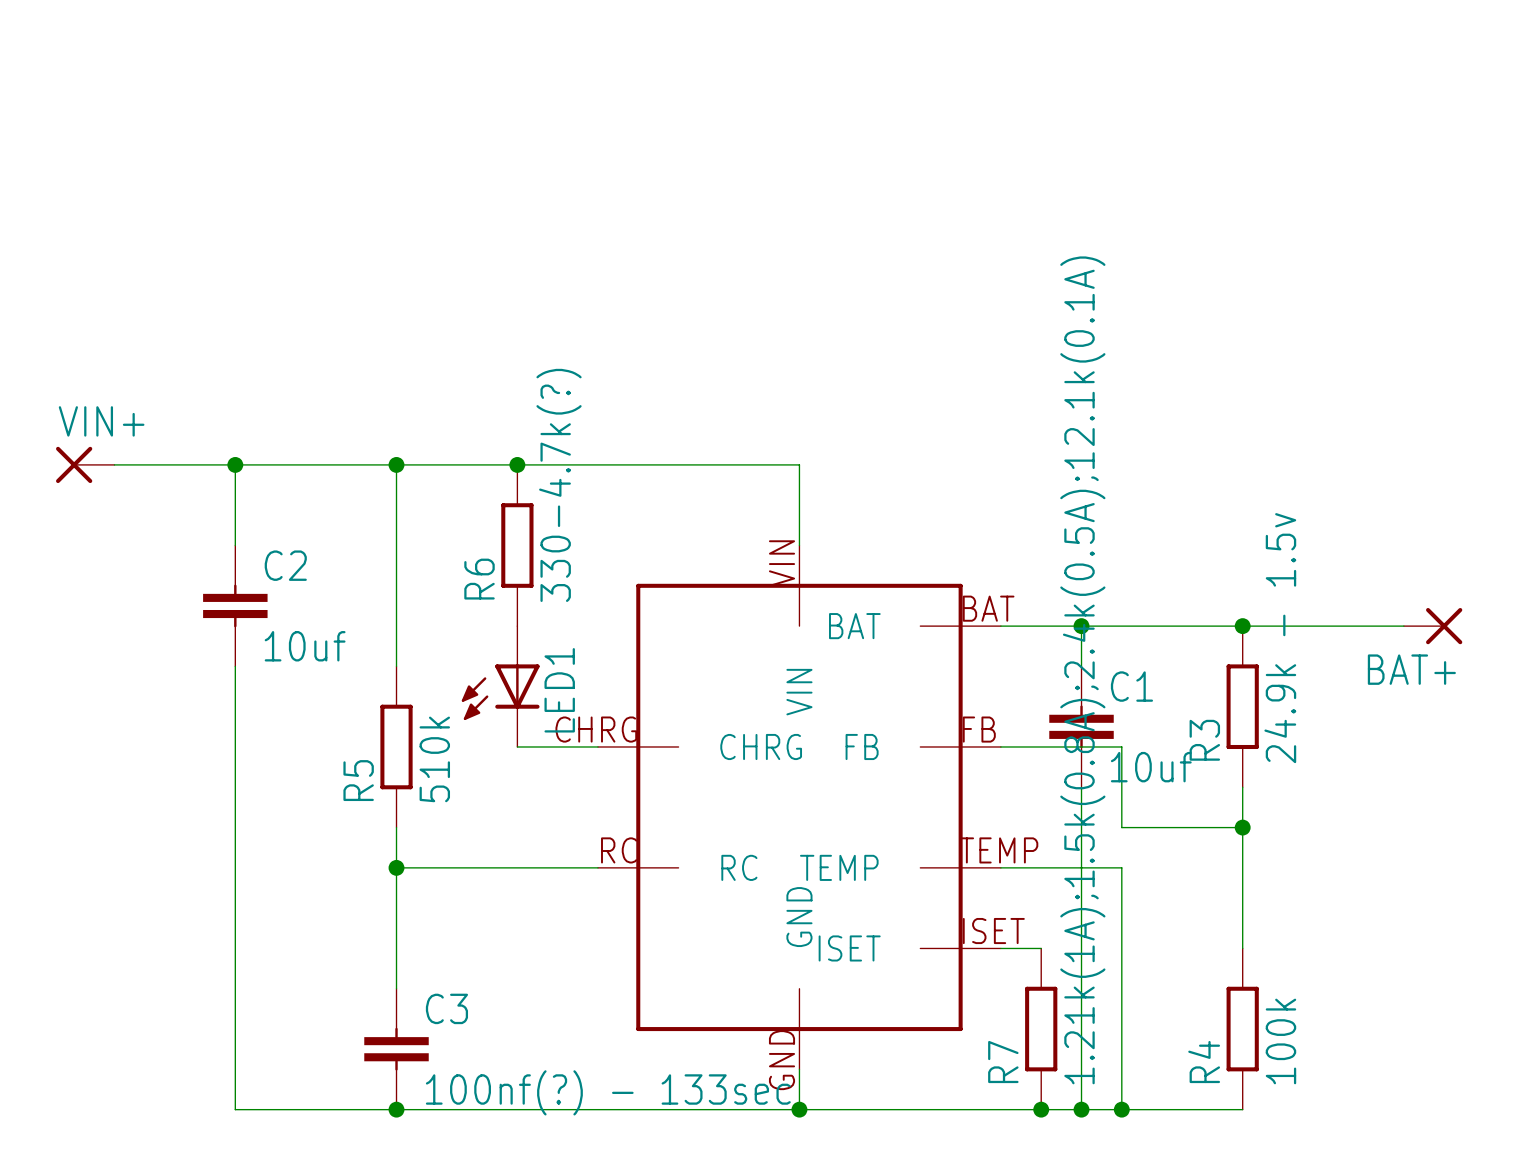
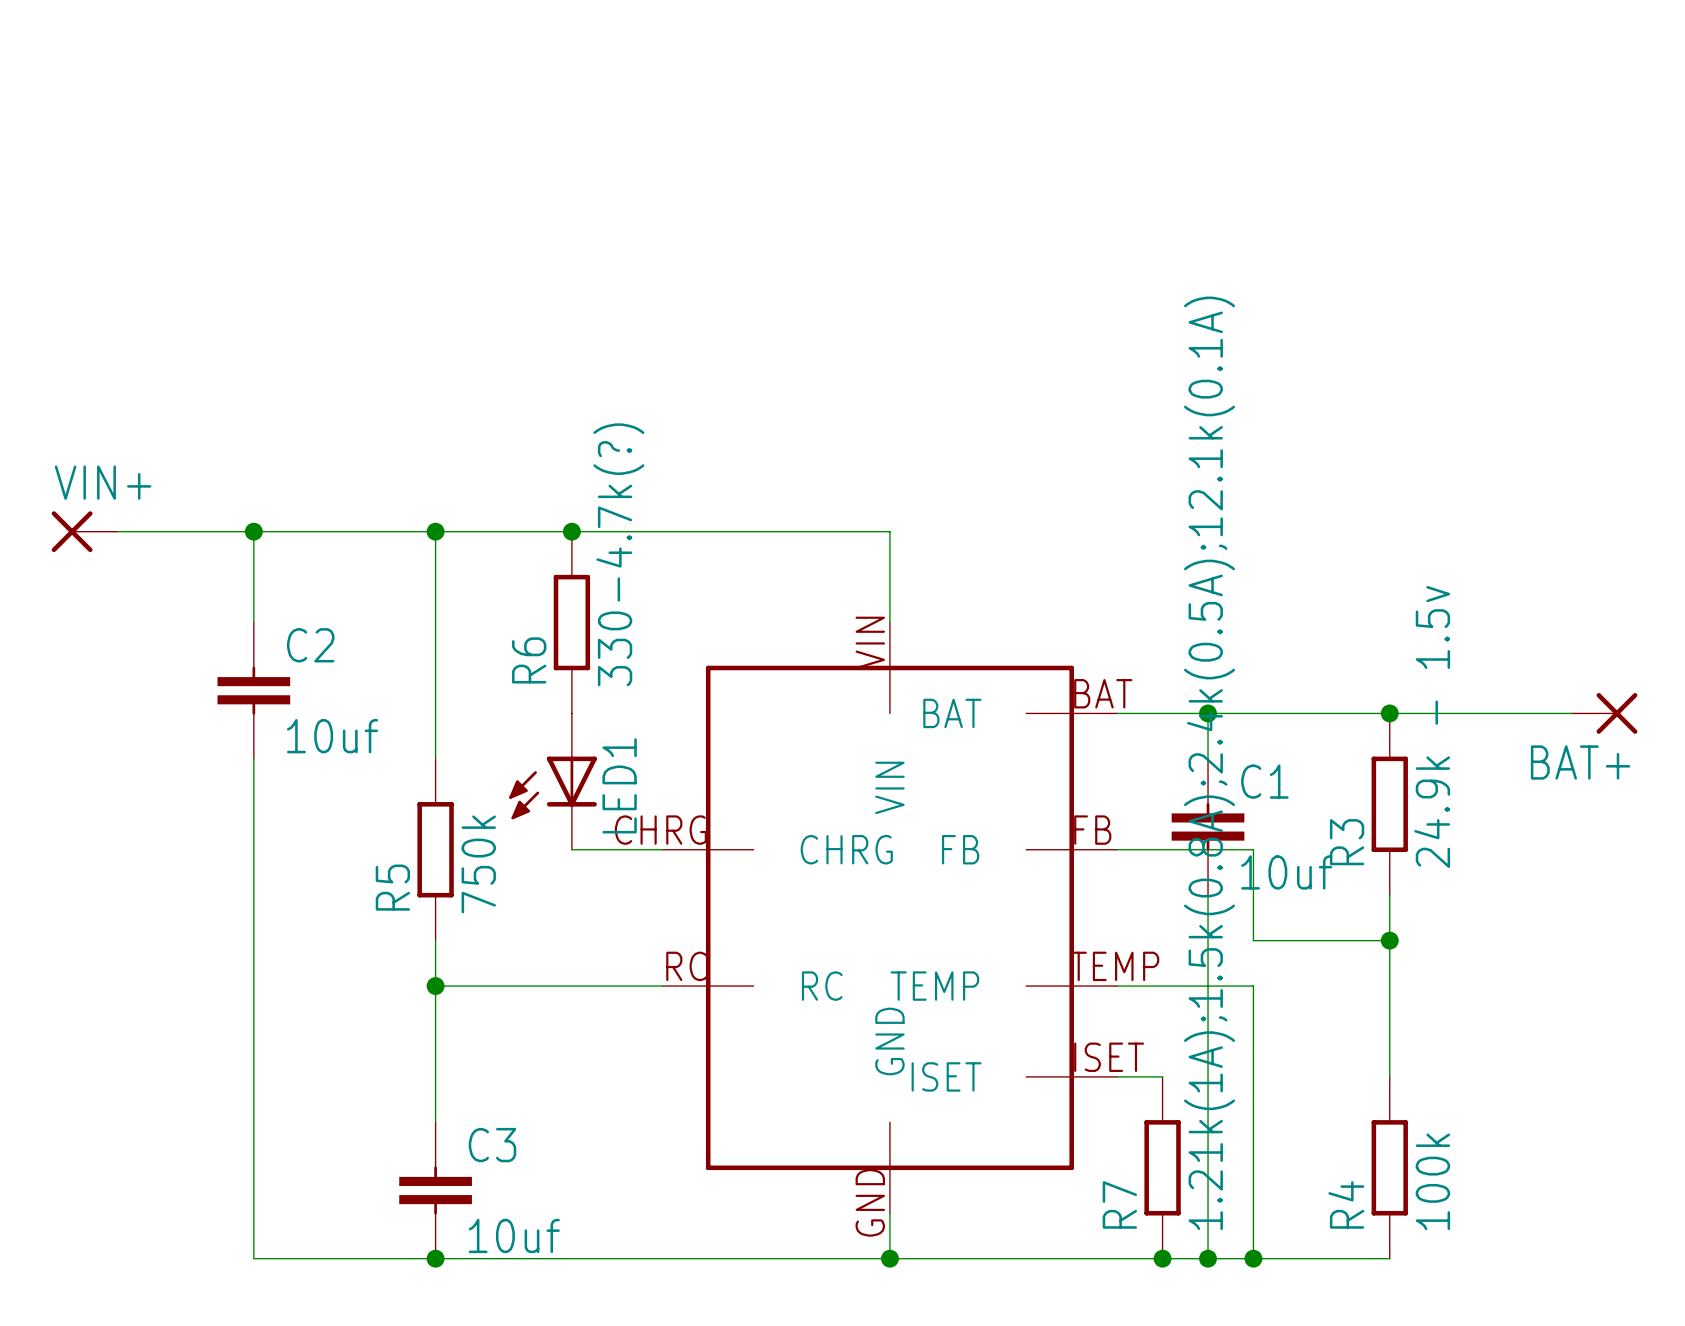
R5 value: 510k (434, 759) -> 750k (478, 864)
C3 value: 100nf(?) - 133sec (608, 1092) -> 10uf (514, 1235)

